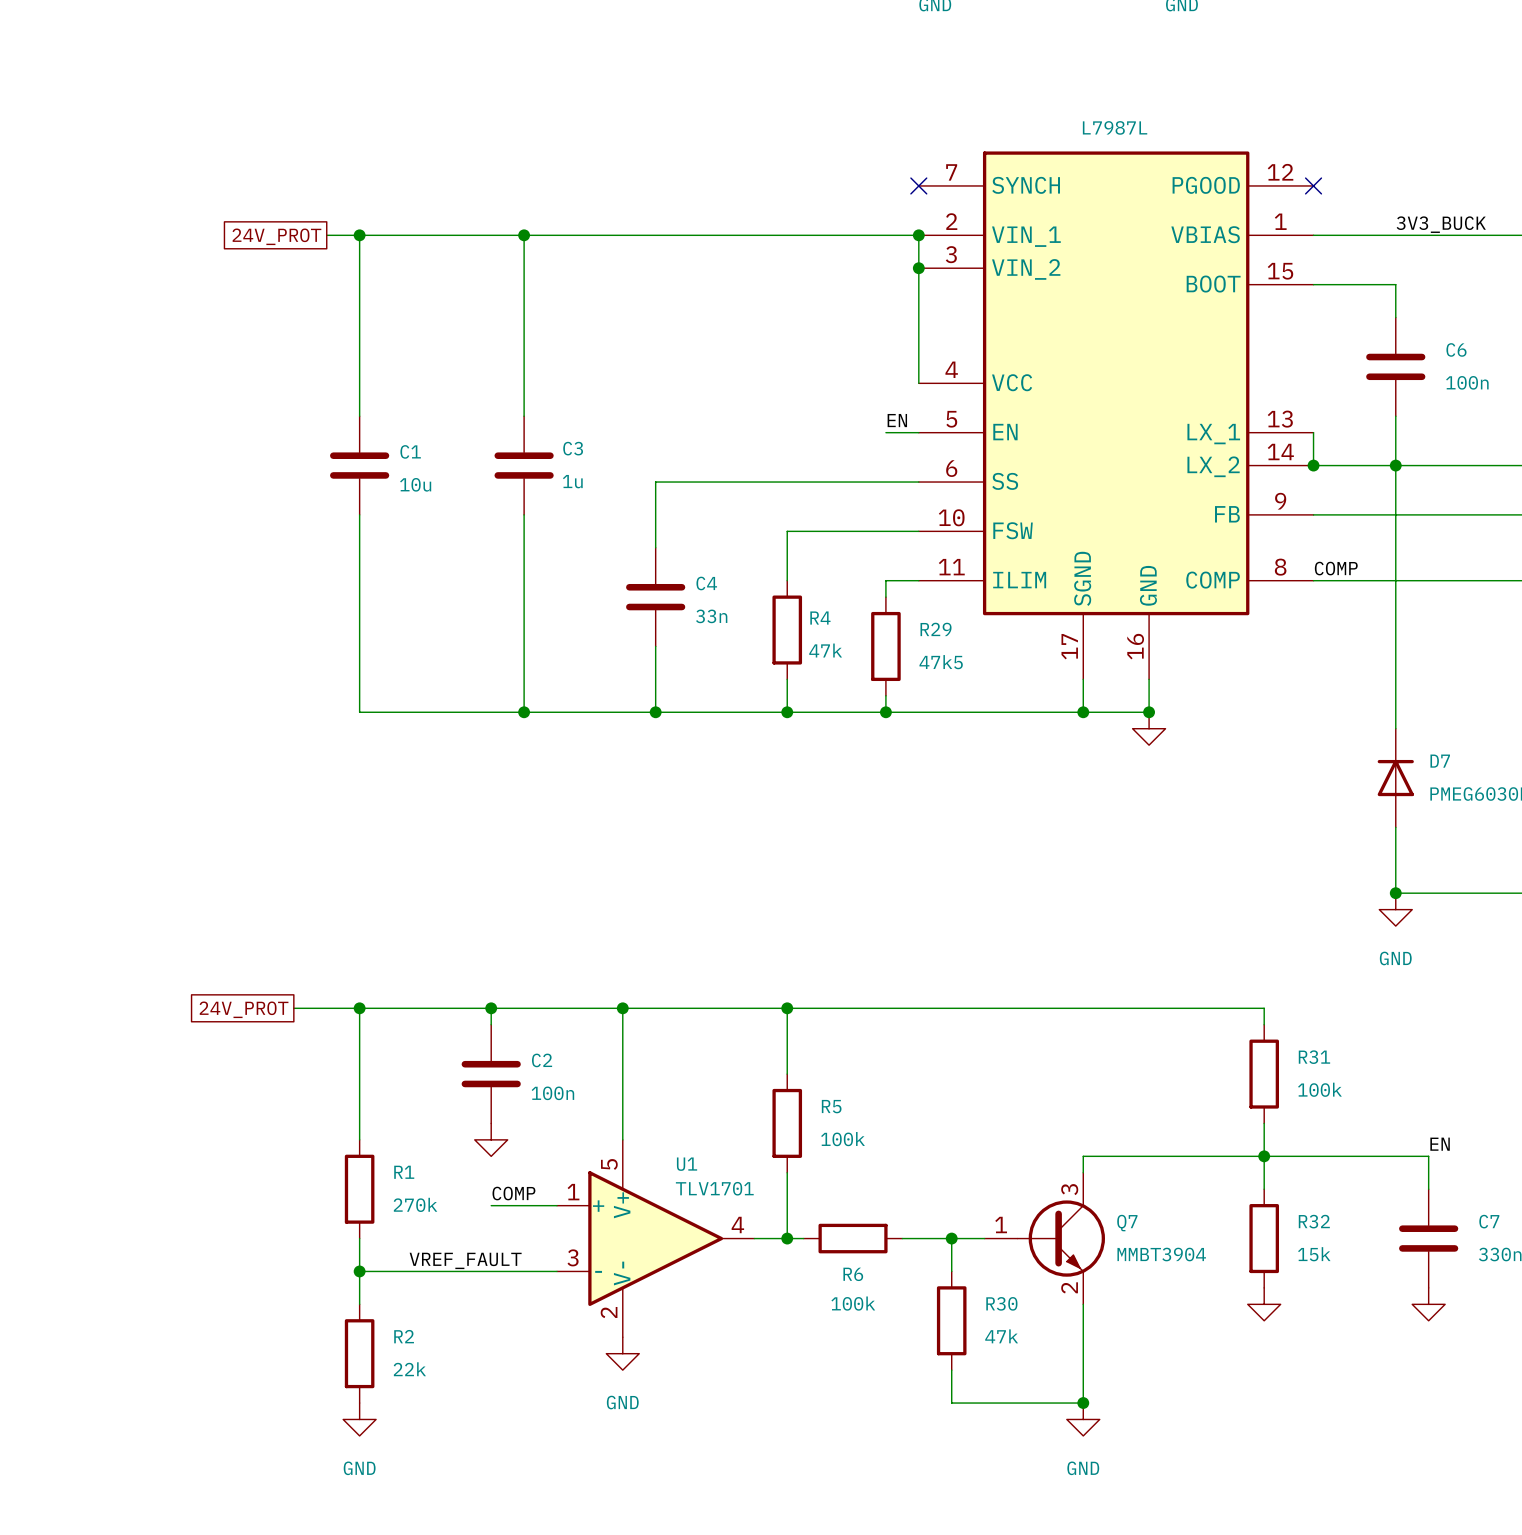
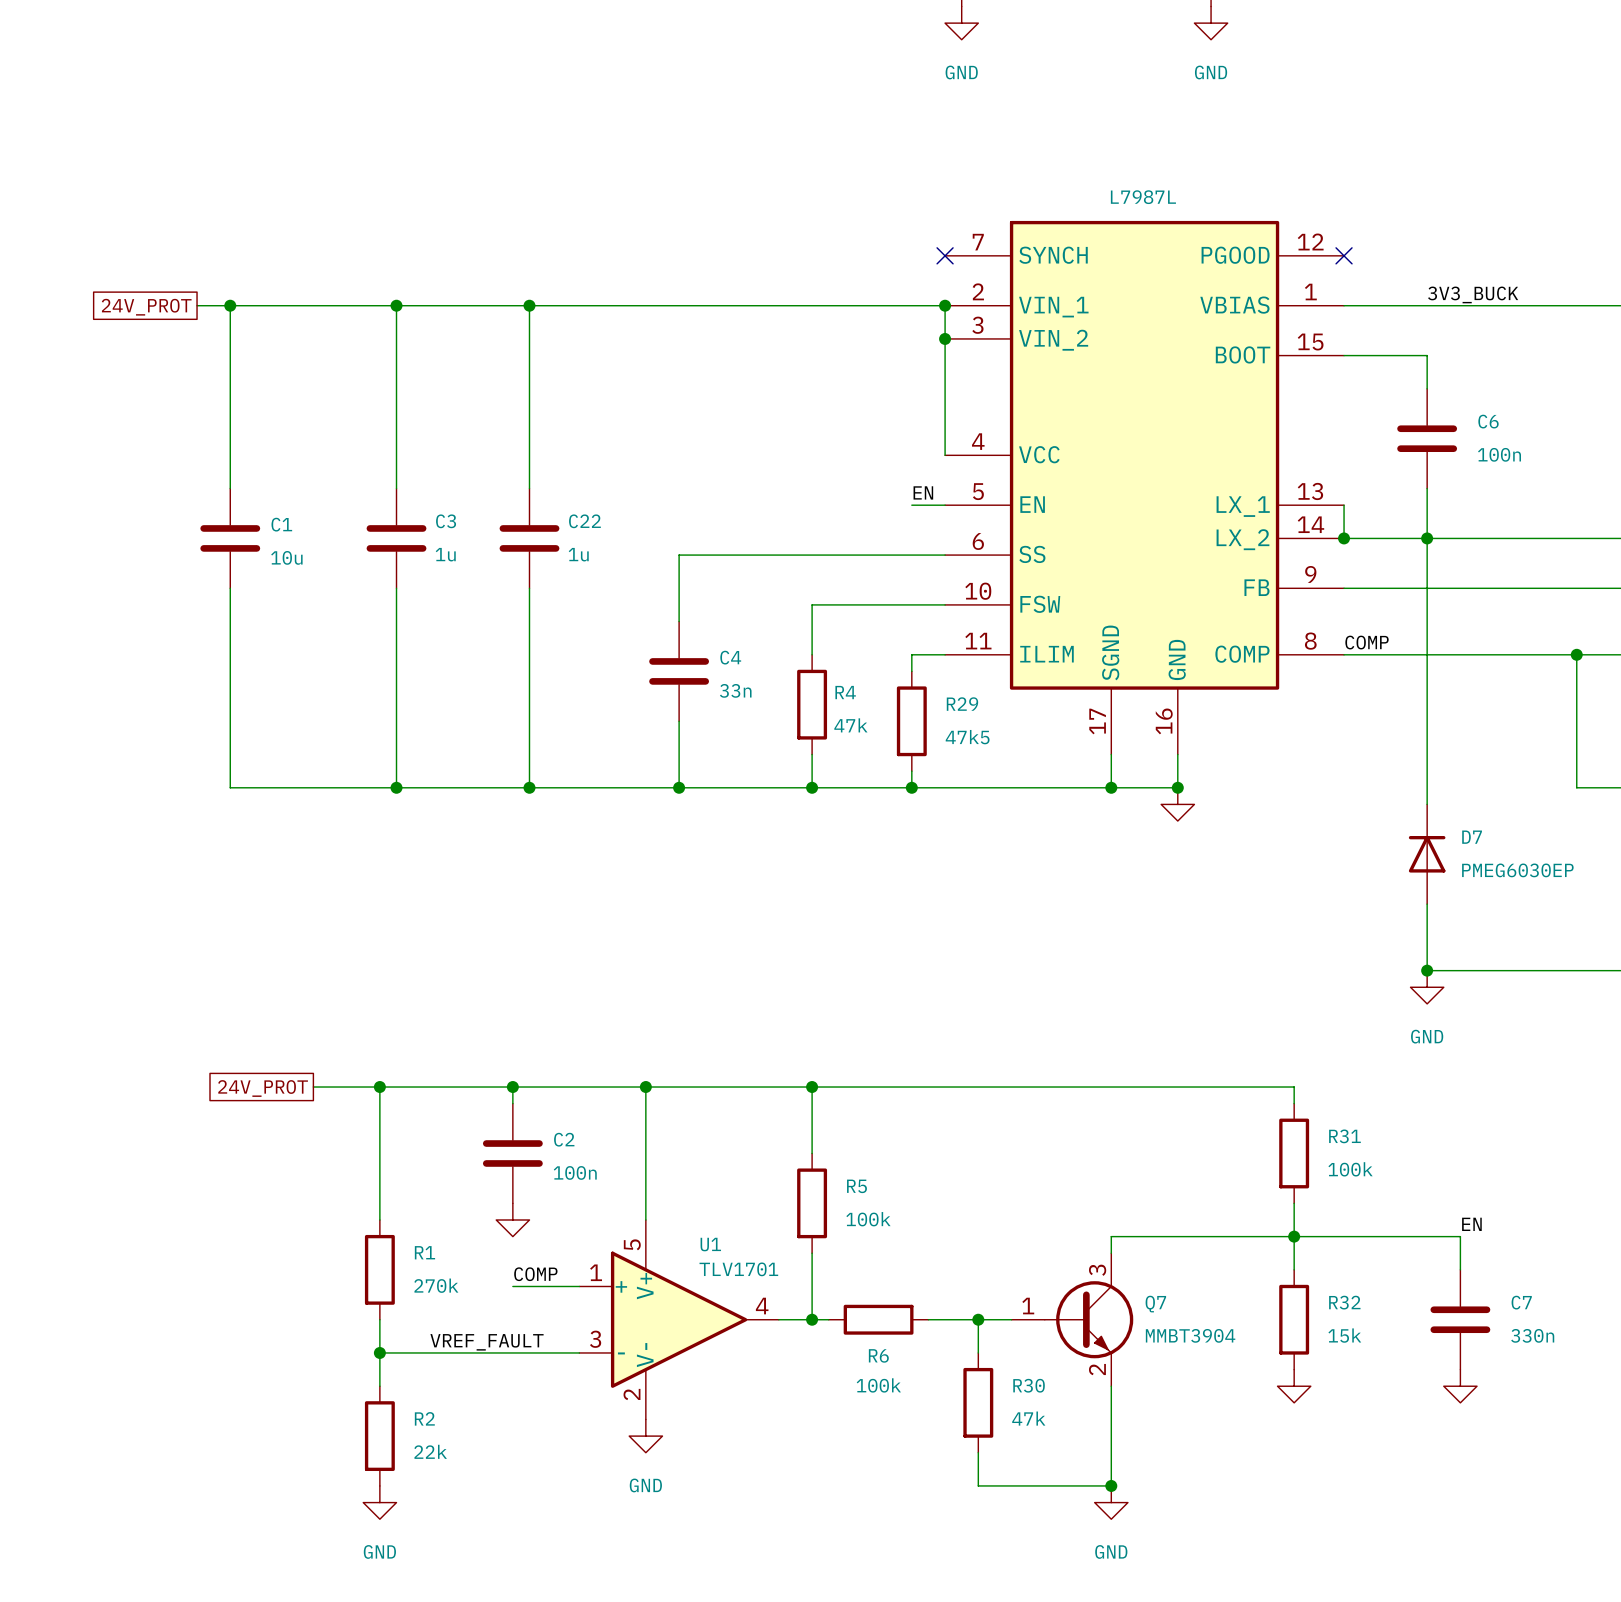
wire: none -> (197, 305) (346, 305)
junction: none -> (230, 305)
wire: (359, 235) (359, 416) -> (230, 305) (230, 488)
junction position: (359, 235) -> (396, 305)
wire: none -> (529, 305) (529, 488)
wire: (524, 235) (524, 416) -> (396, 305) (396, 488)
junction position: (524, 235) -> (529, 305)
global label position: 24V_PROT (276, 236) -> 24V_PROT (146, 307)
C1 position: (359, 465) -> (230, 538)
C22: none -> 1u (529, 538)
C3 position: (524, 465) -> (396, 538)
wire: (359, 514) (359, 712) -> (230, 588) (230, 787) (379, 787)
wire: none -> (529, 588) (529, 787)
wire: (524, 514) (524, 712) -> (396, 588) (396, 787)
junction: none -> (396, 787)
junction position: (524, 712) -> (529, 787)

